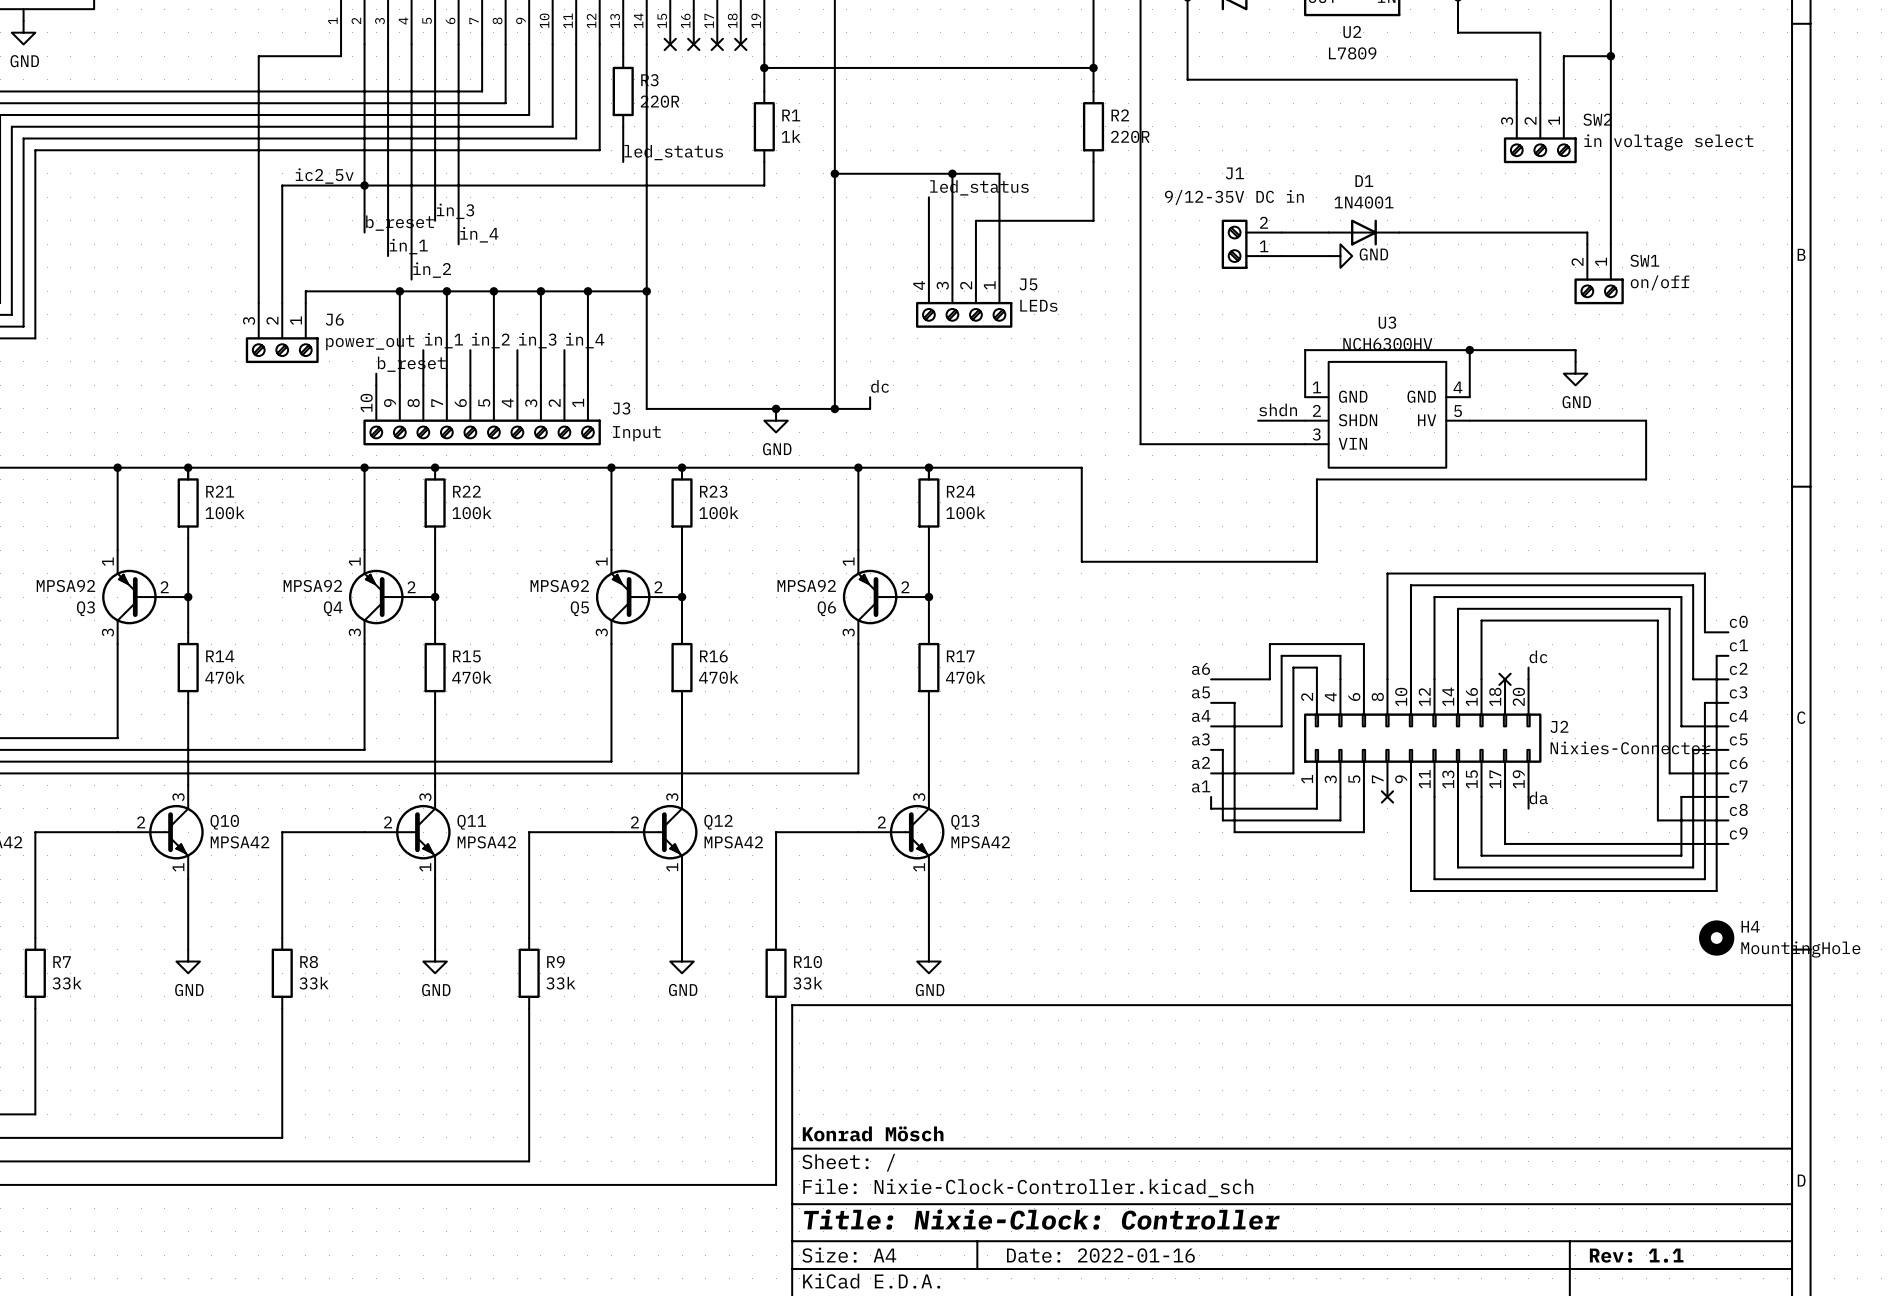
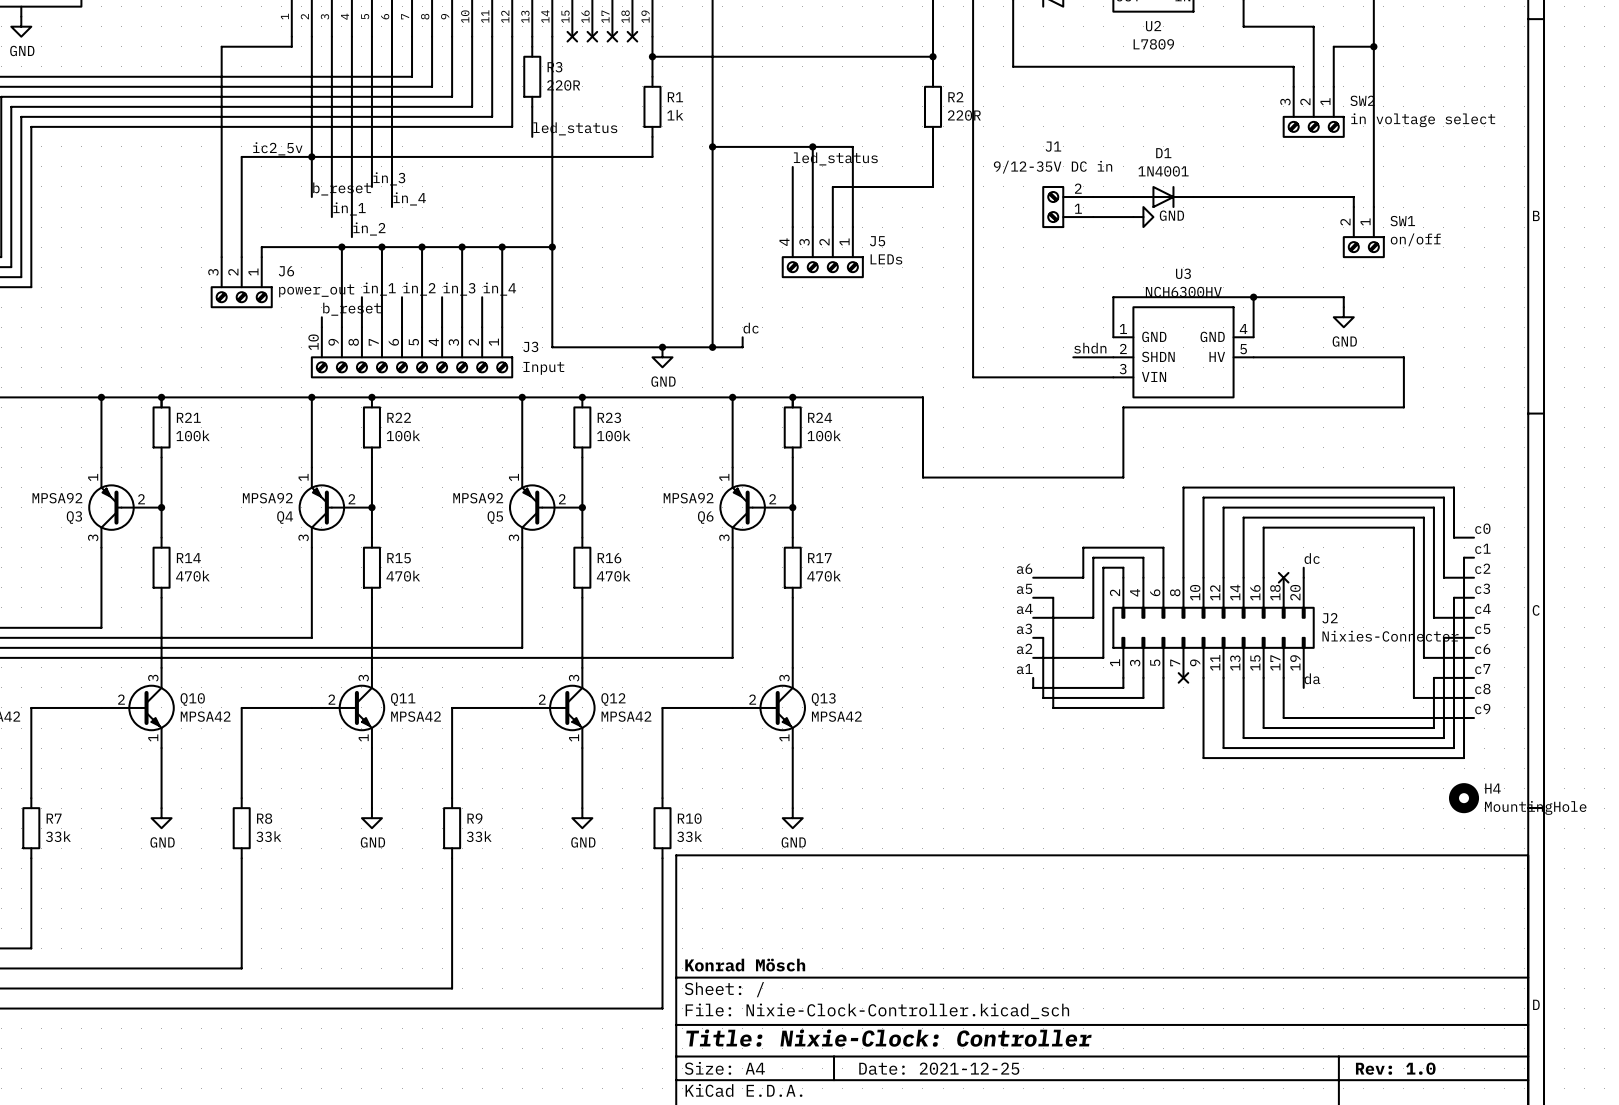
title block: Date: 2022-01-16 (1100, 1255) -> Date: 2021-12-25 (939, 1068)
title block: Rev: 1.1 (1636, 1255) -> Rev: 1.0 (1395, 1068)

